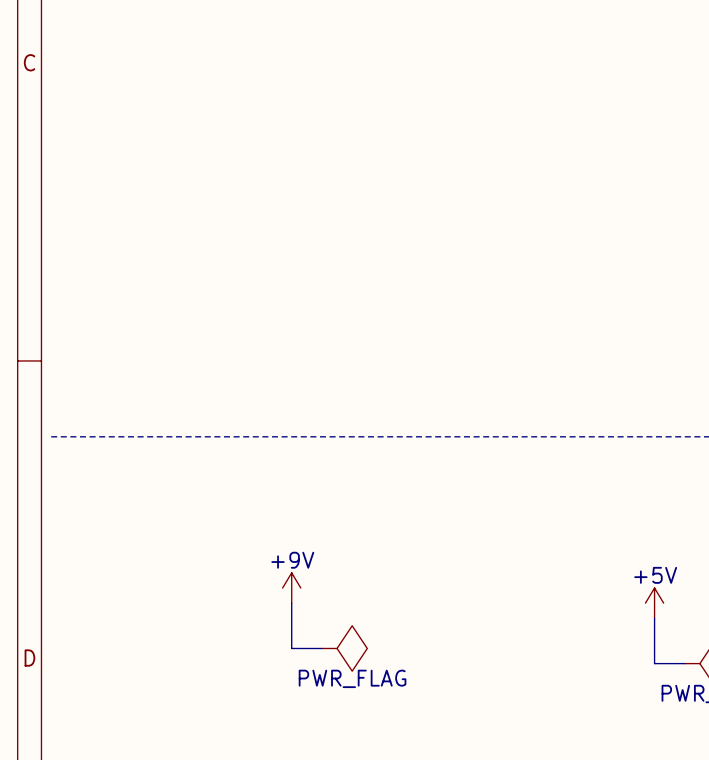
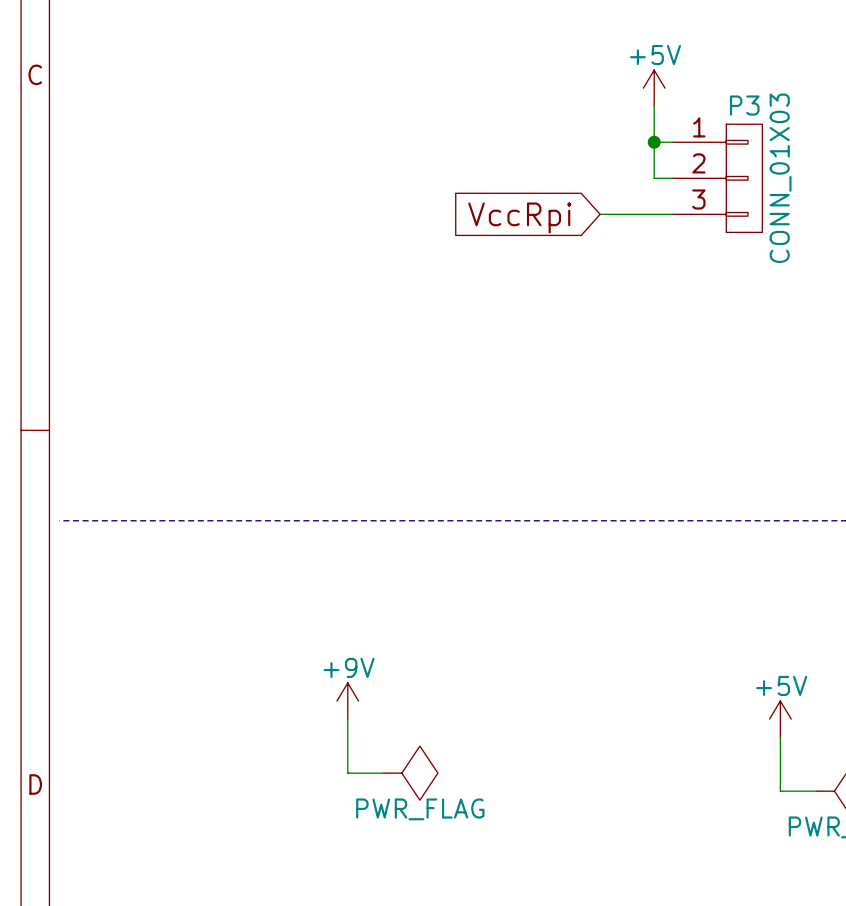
power symbol: none -> +5V (654, 88)
wire: none -> (654, 106) (654, 178) (672, 178)
wire: none -> (654, 142) (672, 142)
junction: none -> (654, 142)
P3: none -> CONN_01X03 (717, 178)
wire: none -> (600, 214) (672, 214)
global label: none -> VccRpi (519, 217)

